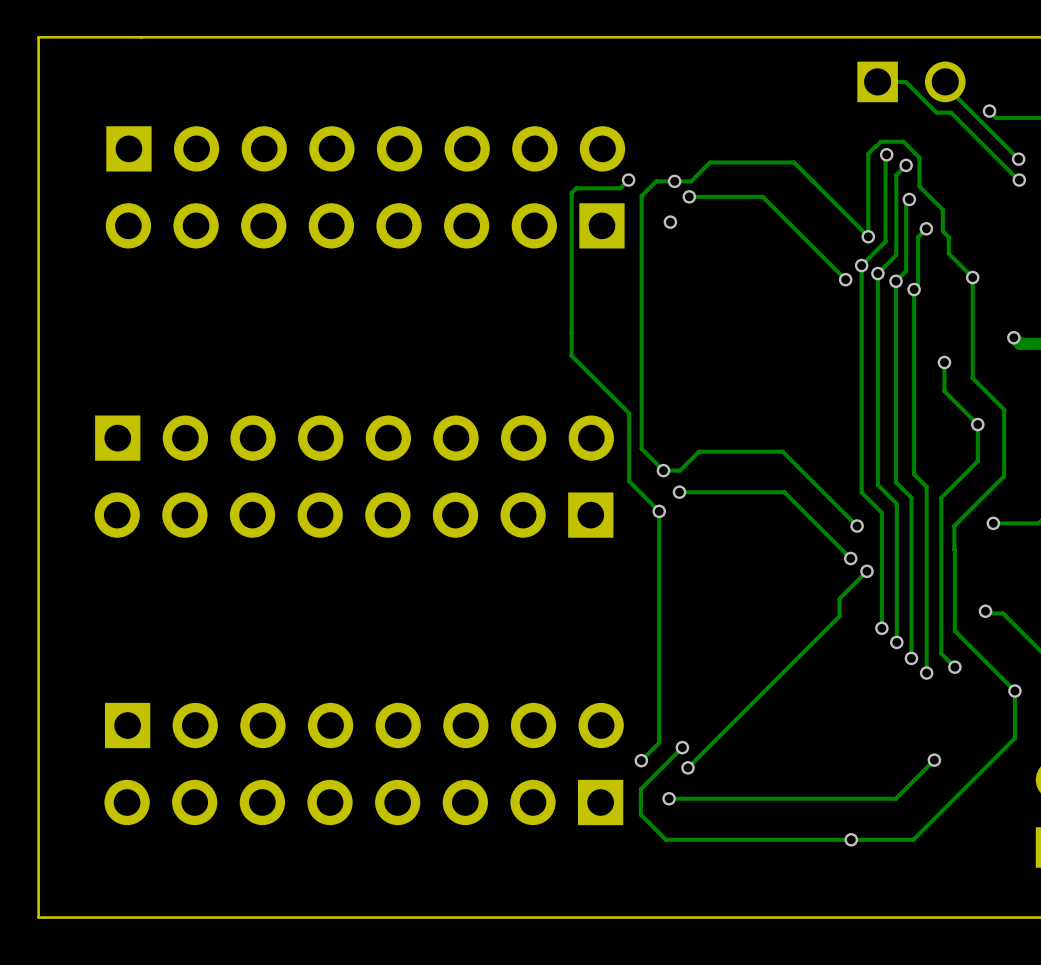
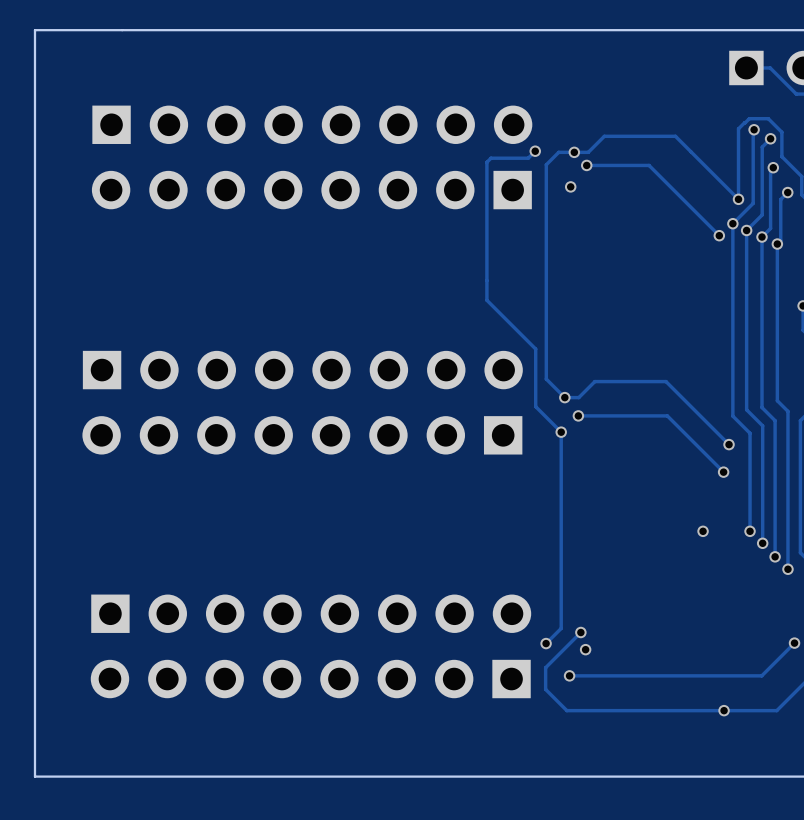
track: (866, 571) (839, 598) (839, 616) (687, 767) -> none
via position: (866, 571) -> (703, 531)

